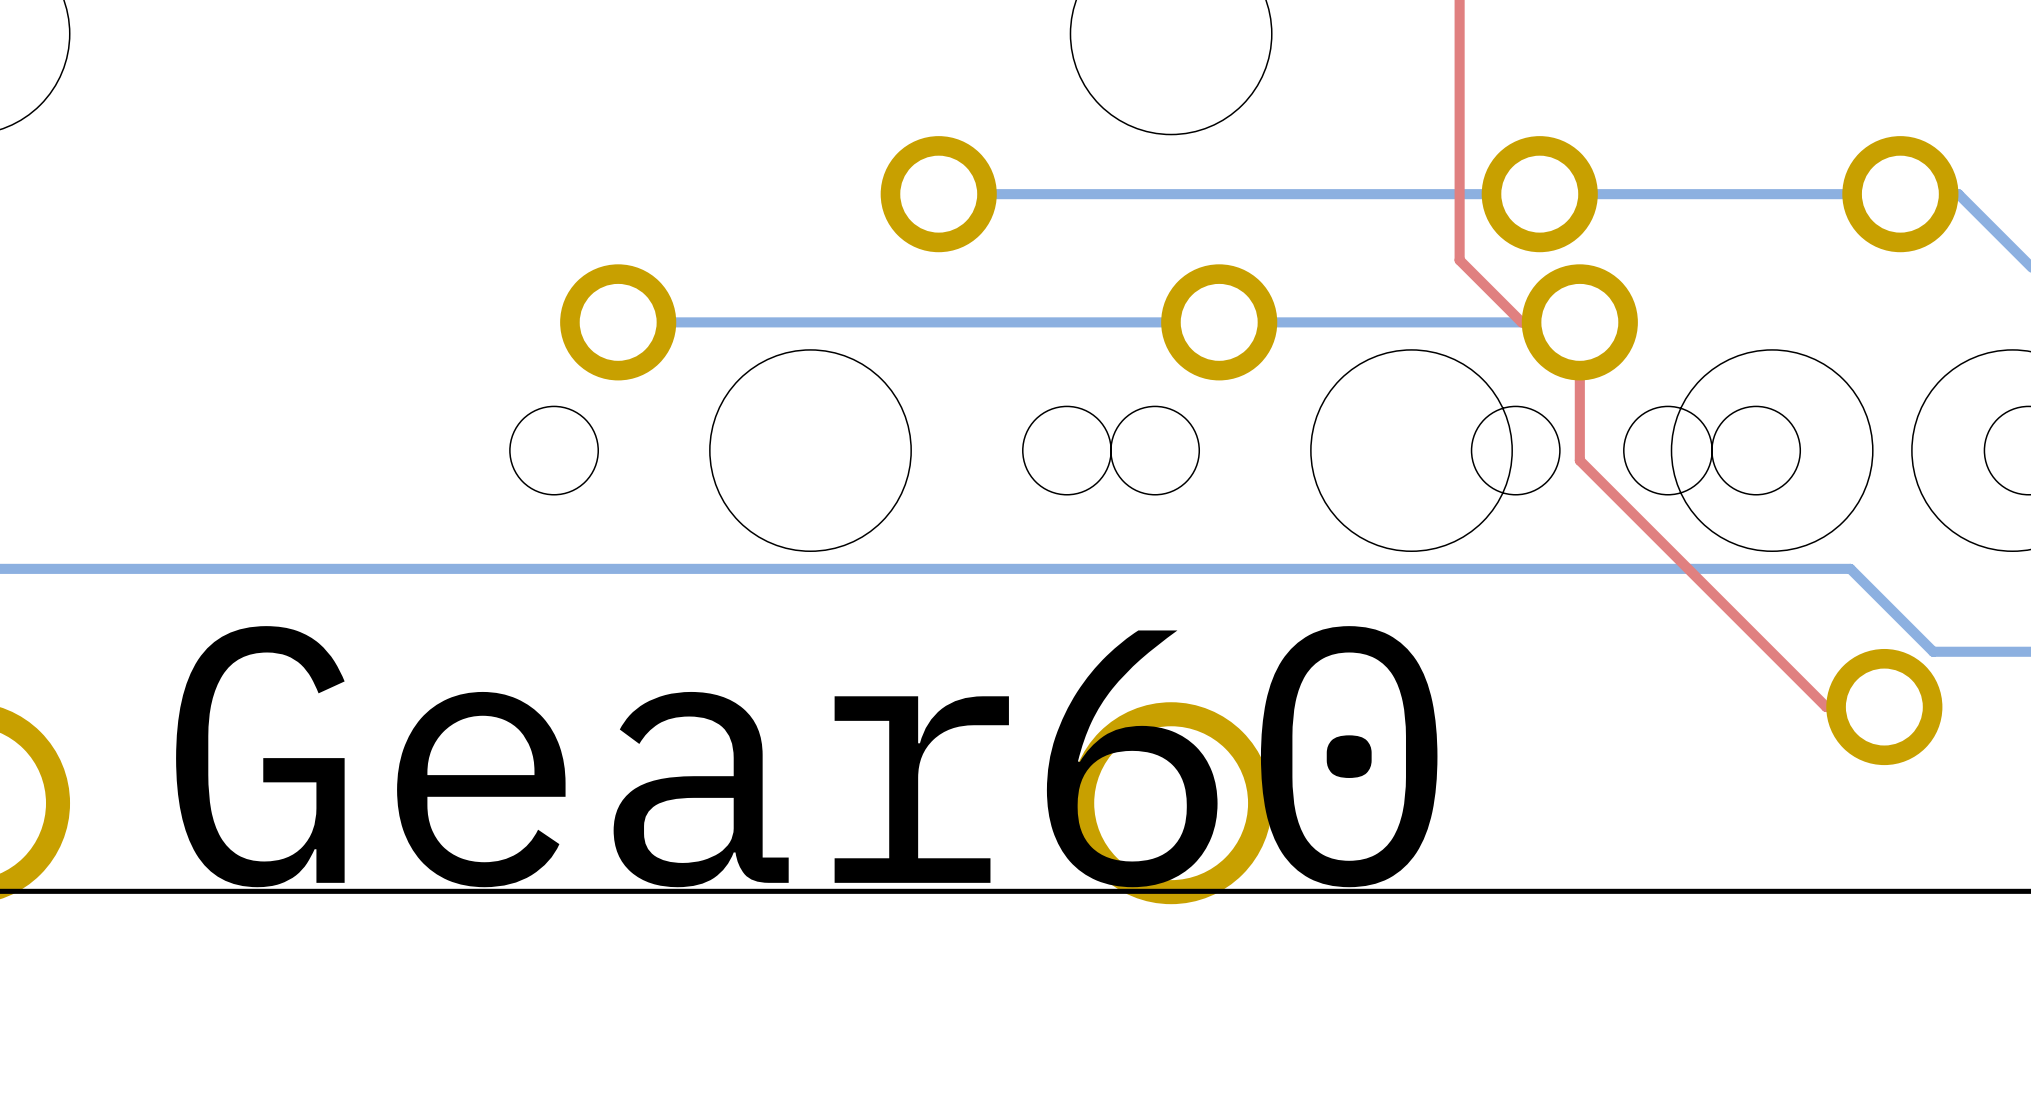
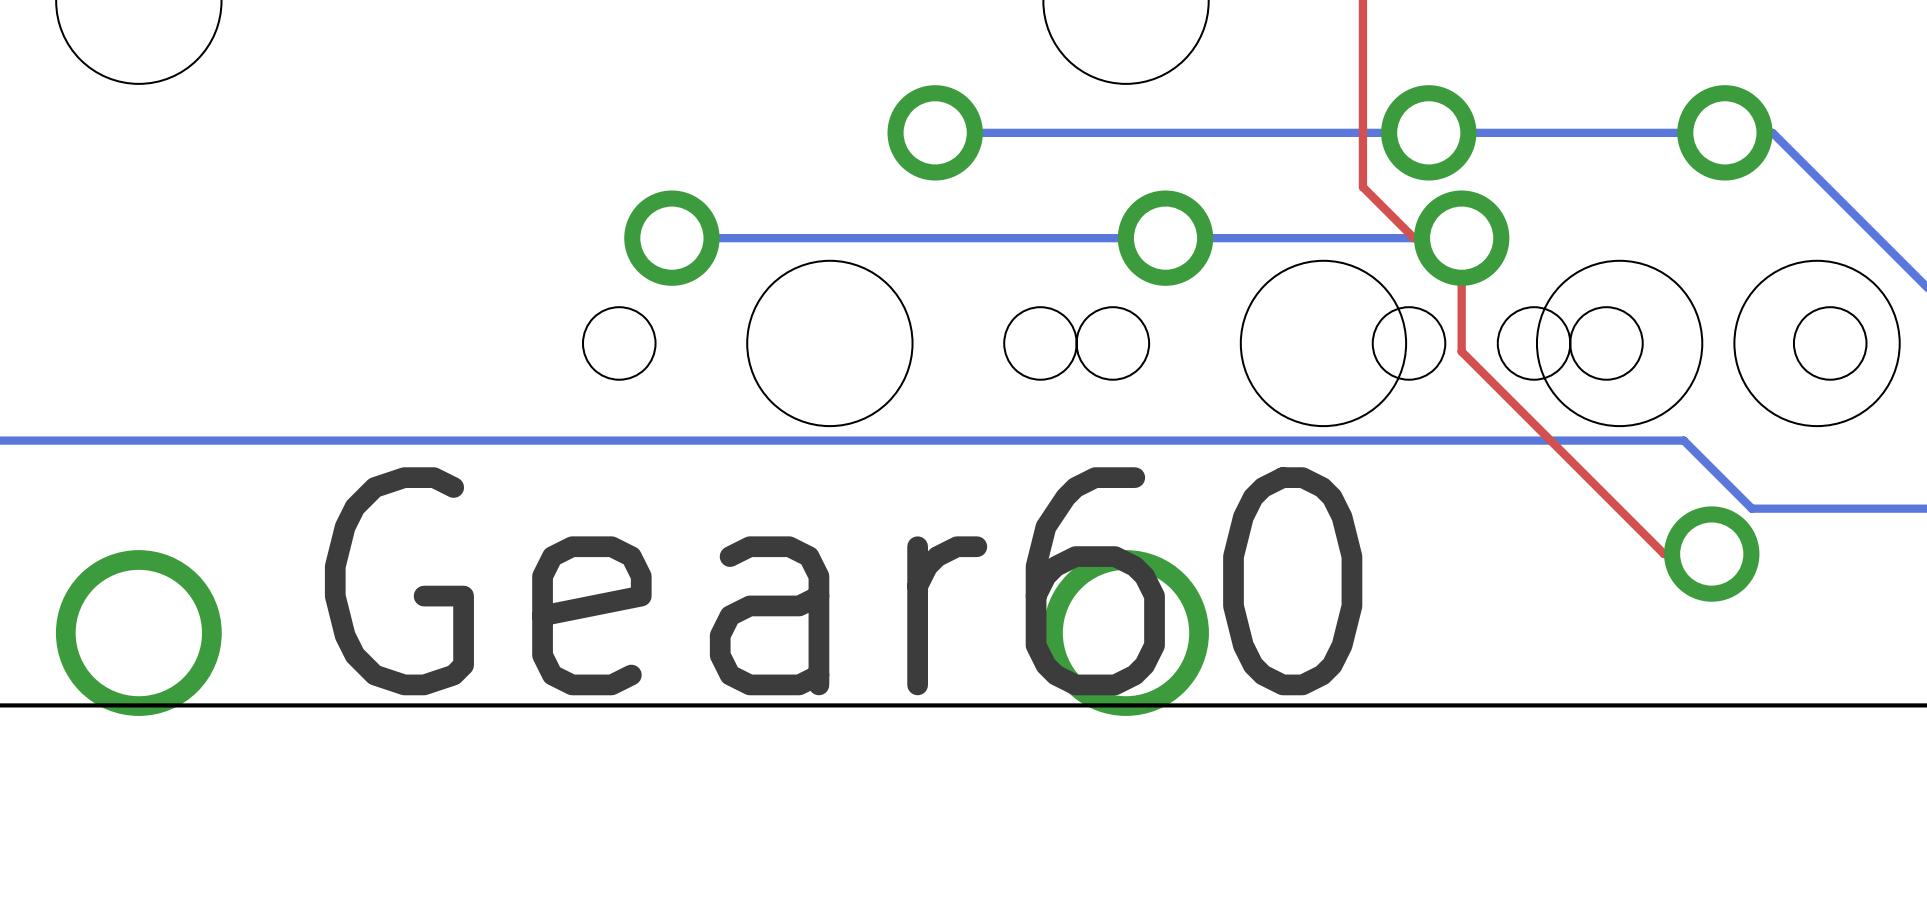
text position: Gear60 (806, 756) -> Gear60 (843, 581)

